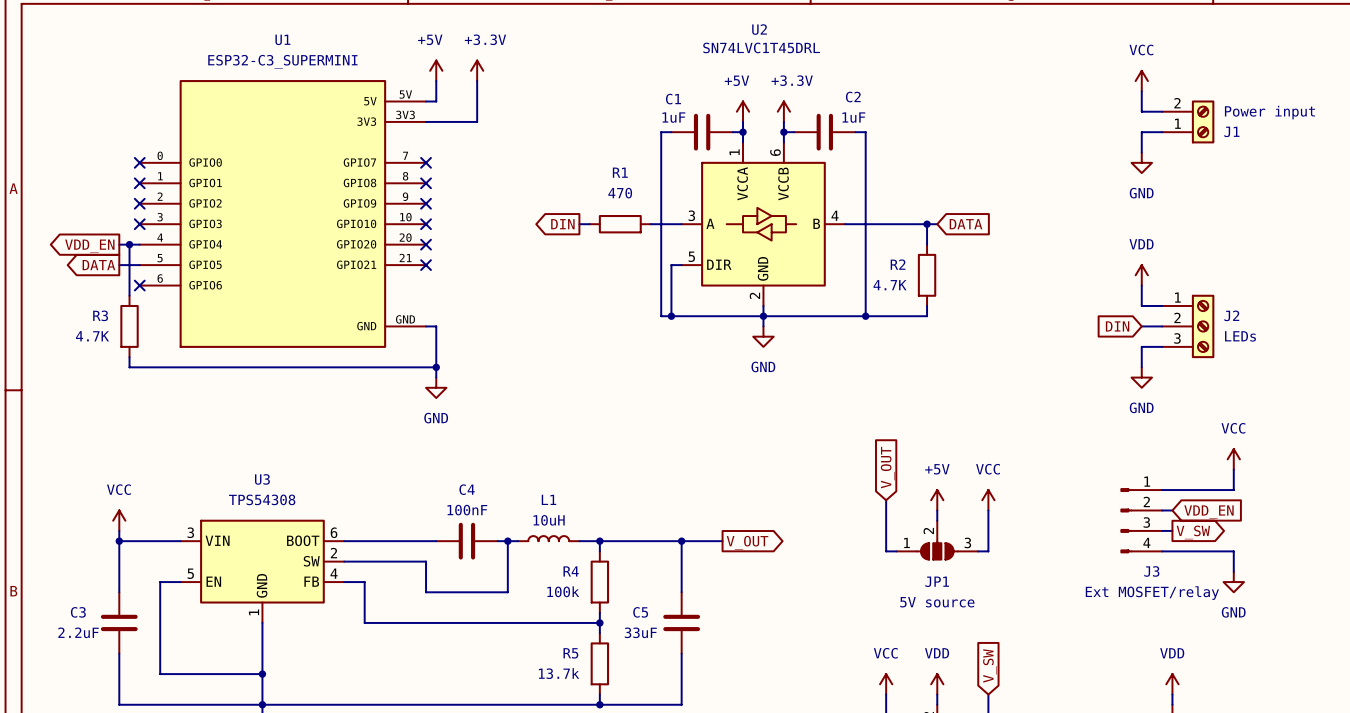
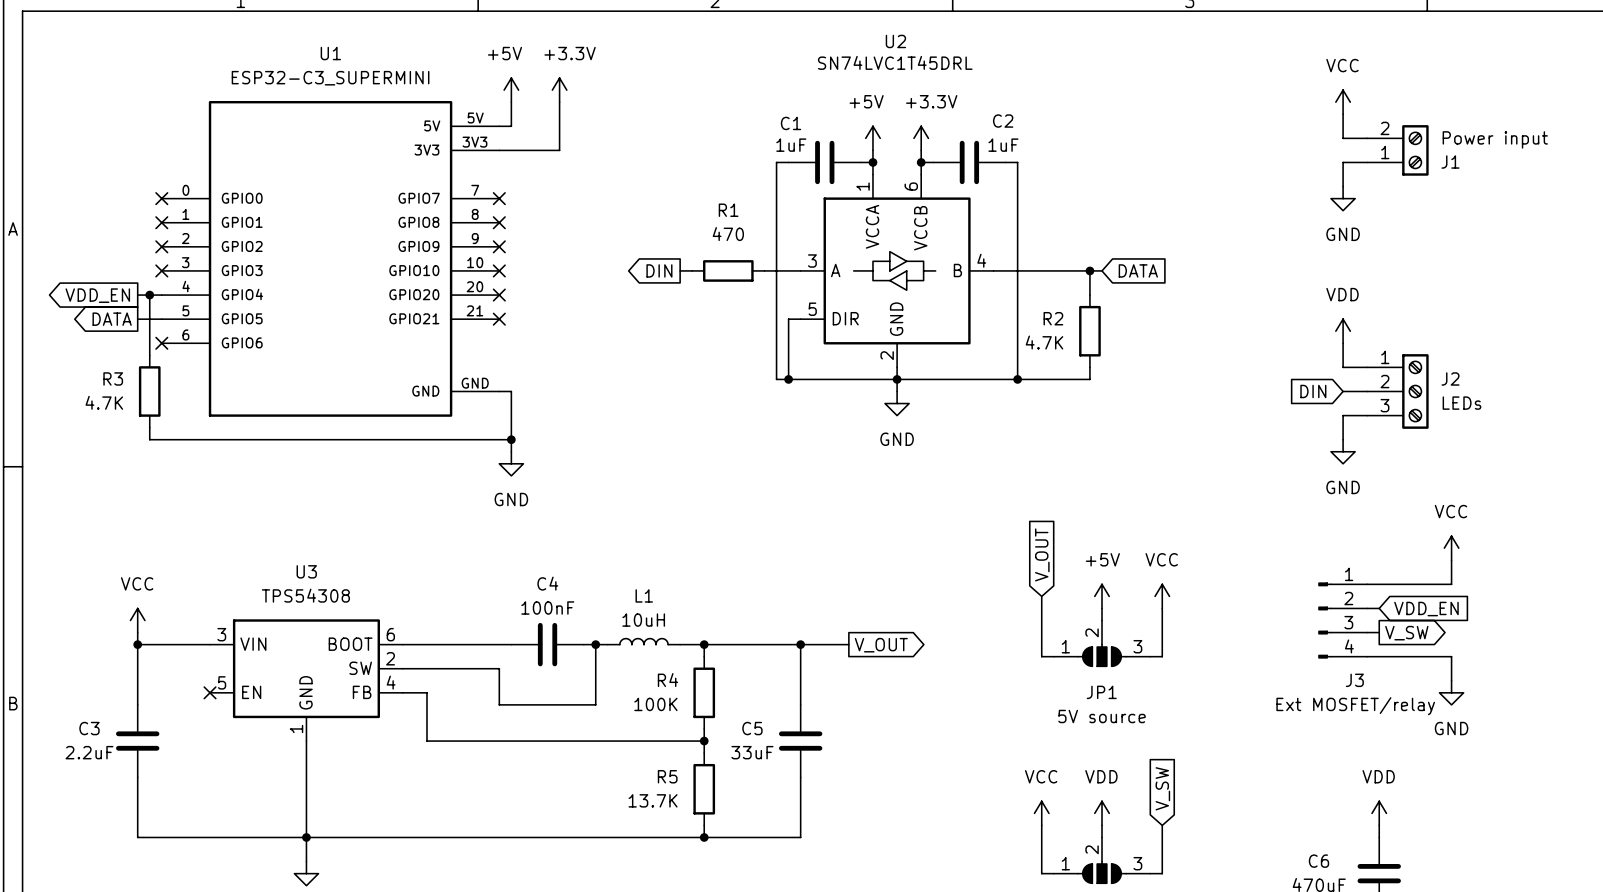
wire: (180, 582) (160, 582) (160, 674) (262, 674) -> none
no-connect mark: none -> (210, 692)
R4 value: 100k (563, 591) -> 100K (655, 704)
R5 value: 13.7k (559, 673) -> 13.7K (653, 800)
junction: (262, 674) -> none

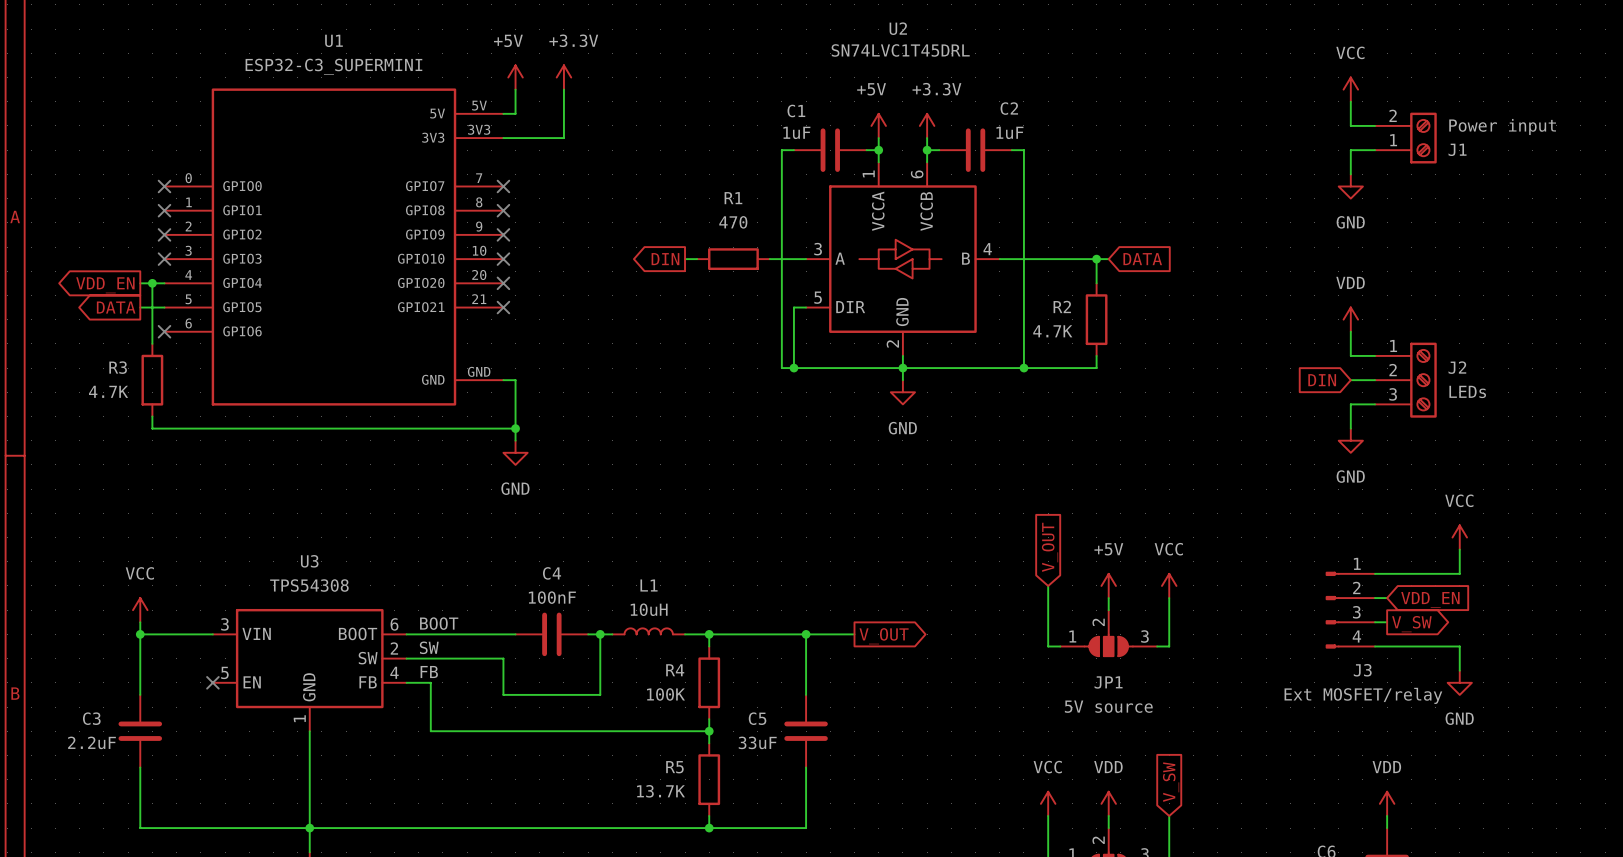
label: none -> BOOT (439, 623)
label: none -> SW (429, 647)
label: none -> FB (429, 672)

